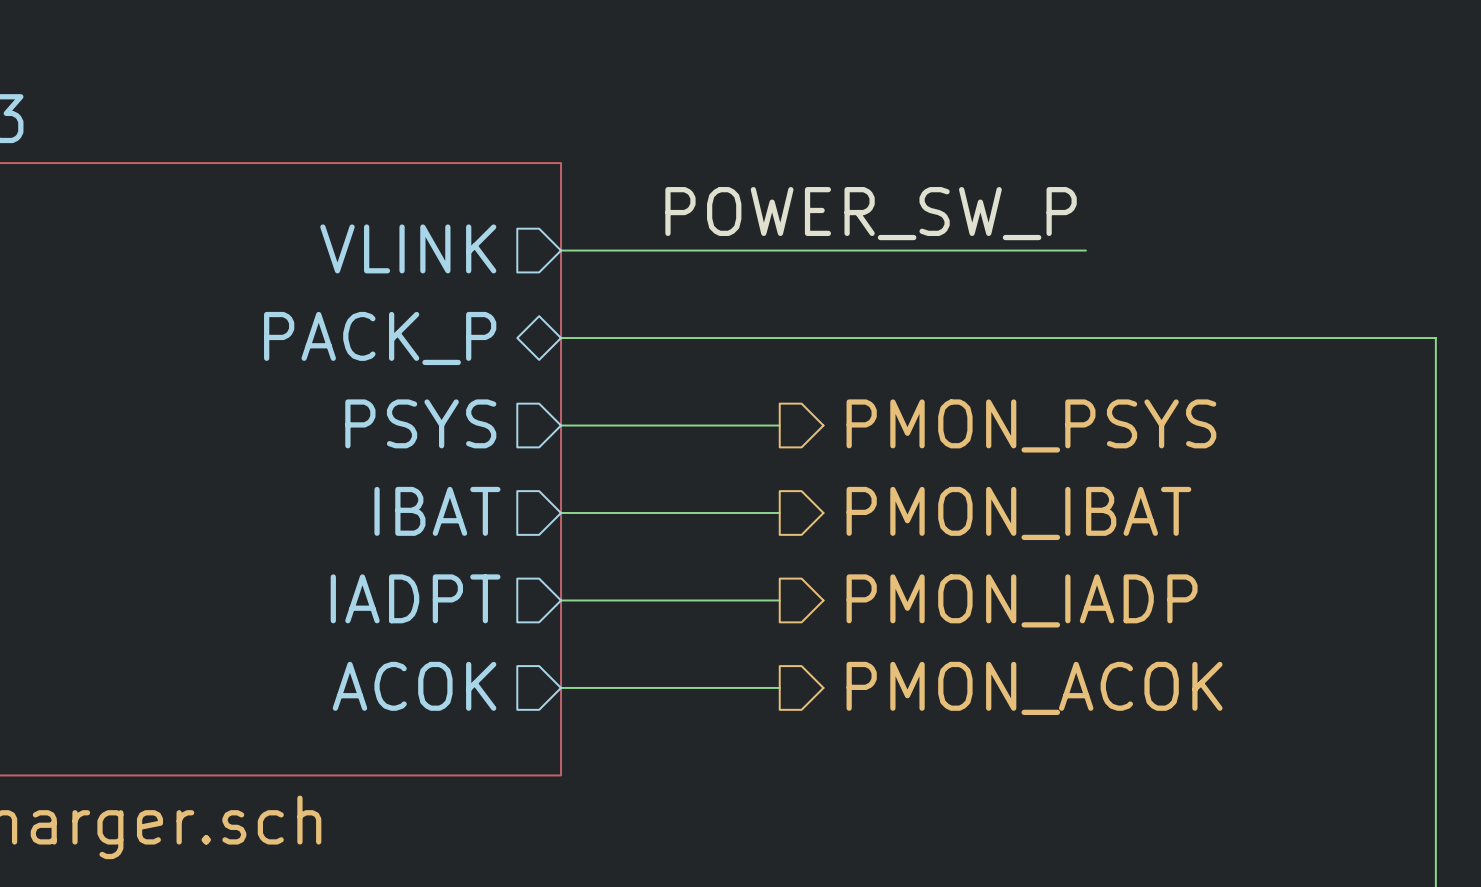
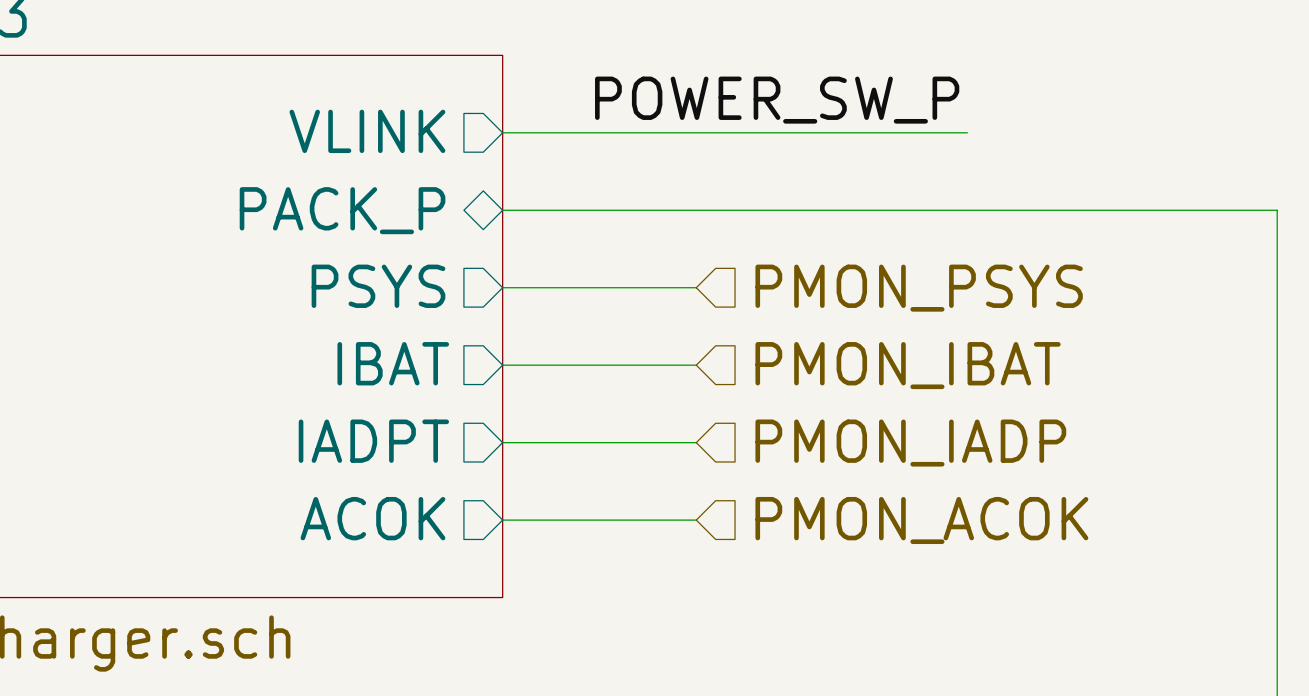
hierarchical label shape: output (1031, 425) -> input (919, 288)
hierarchical label shape: output (1018, 513) -> input (908, 365)
hierarchical label shape: output (1022, 600) -> input (910, 443)
hierarchical label shape: output (1034, 688) -> input (921, 520)

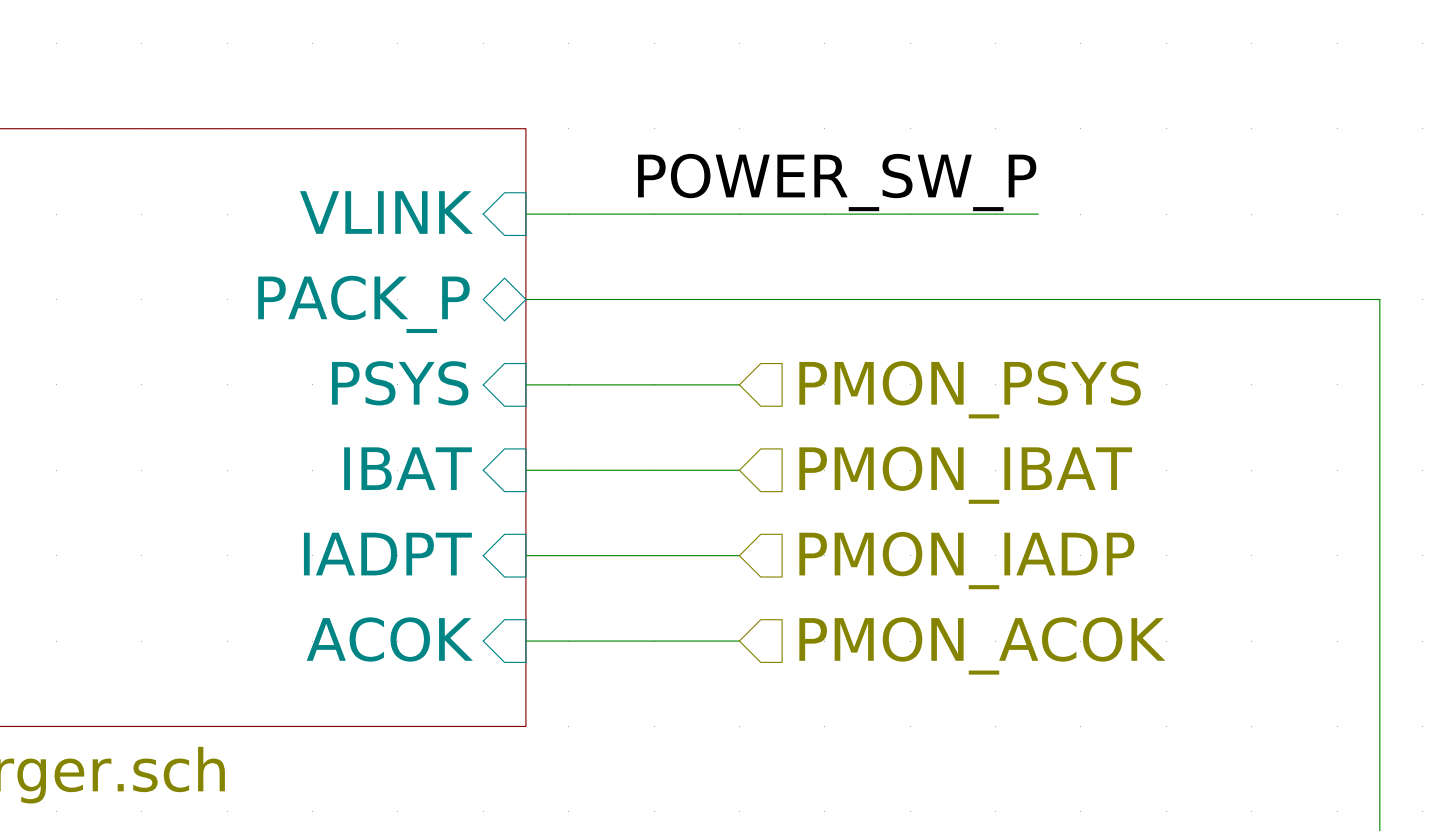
sheet pin shape: output (367, 131) -> input (386, 212)
sheet pin shape: output (378, 286) -> input (400, 383)
sheet pin shape: output (393, 363) -> input (408, 468)
sheet pin shape: output (373, 441) -> input (387, 554)
sheet pin shape: output (372, 518) -> input (389, 639)

